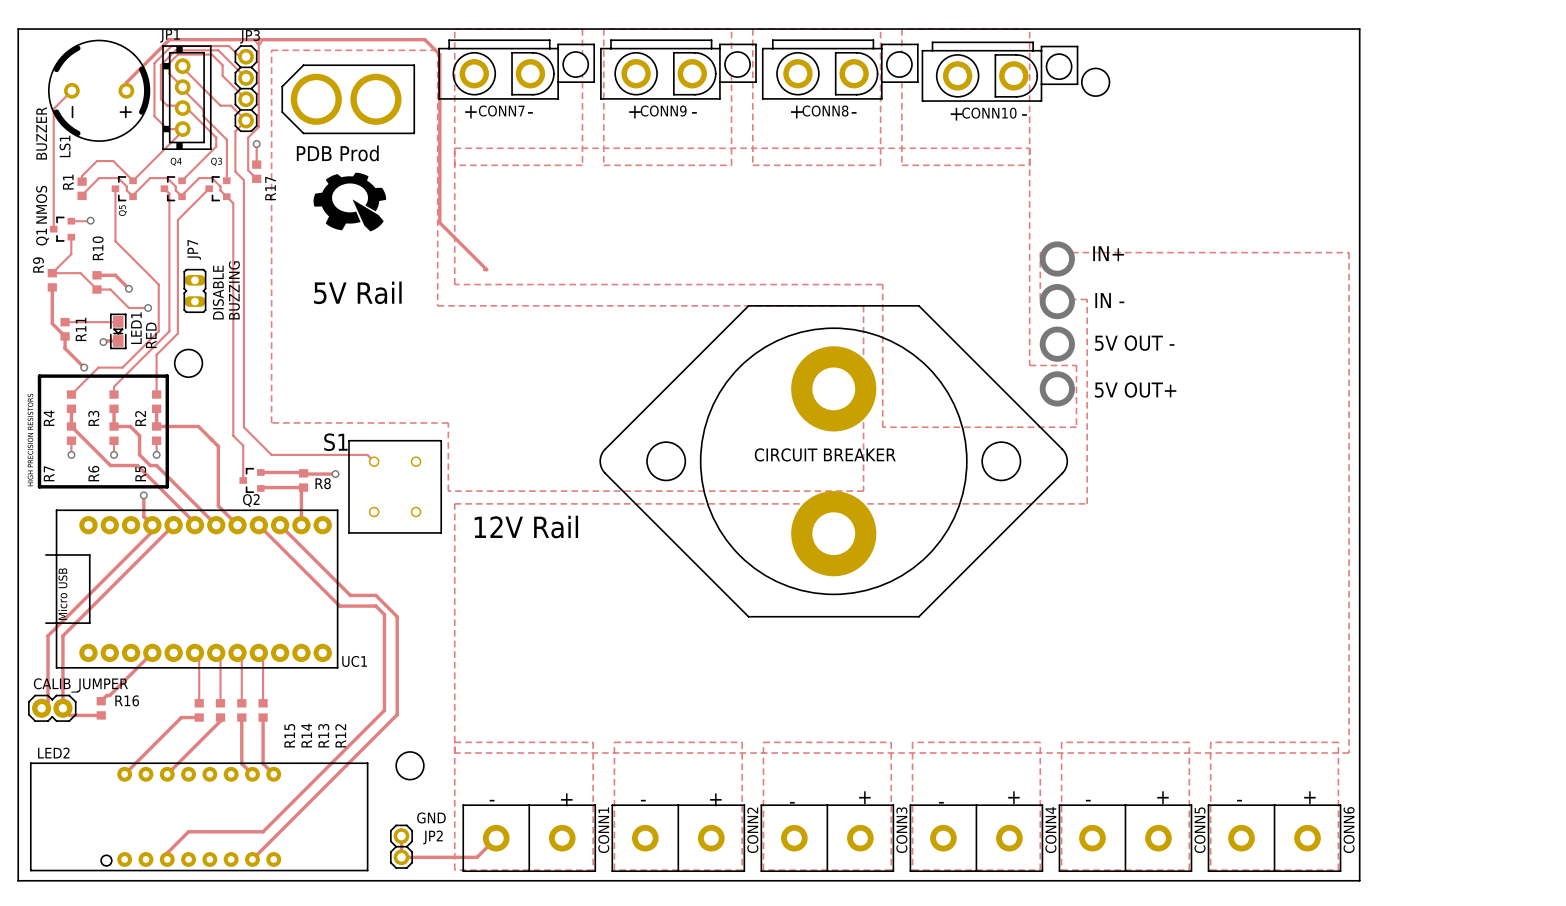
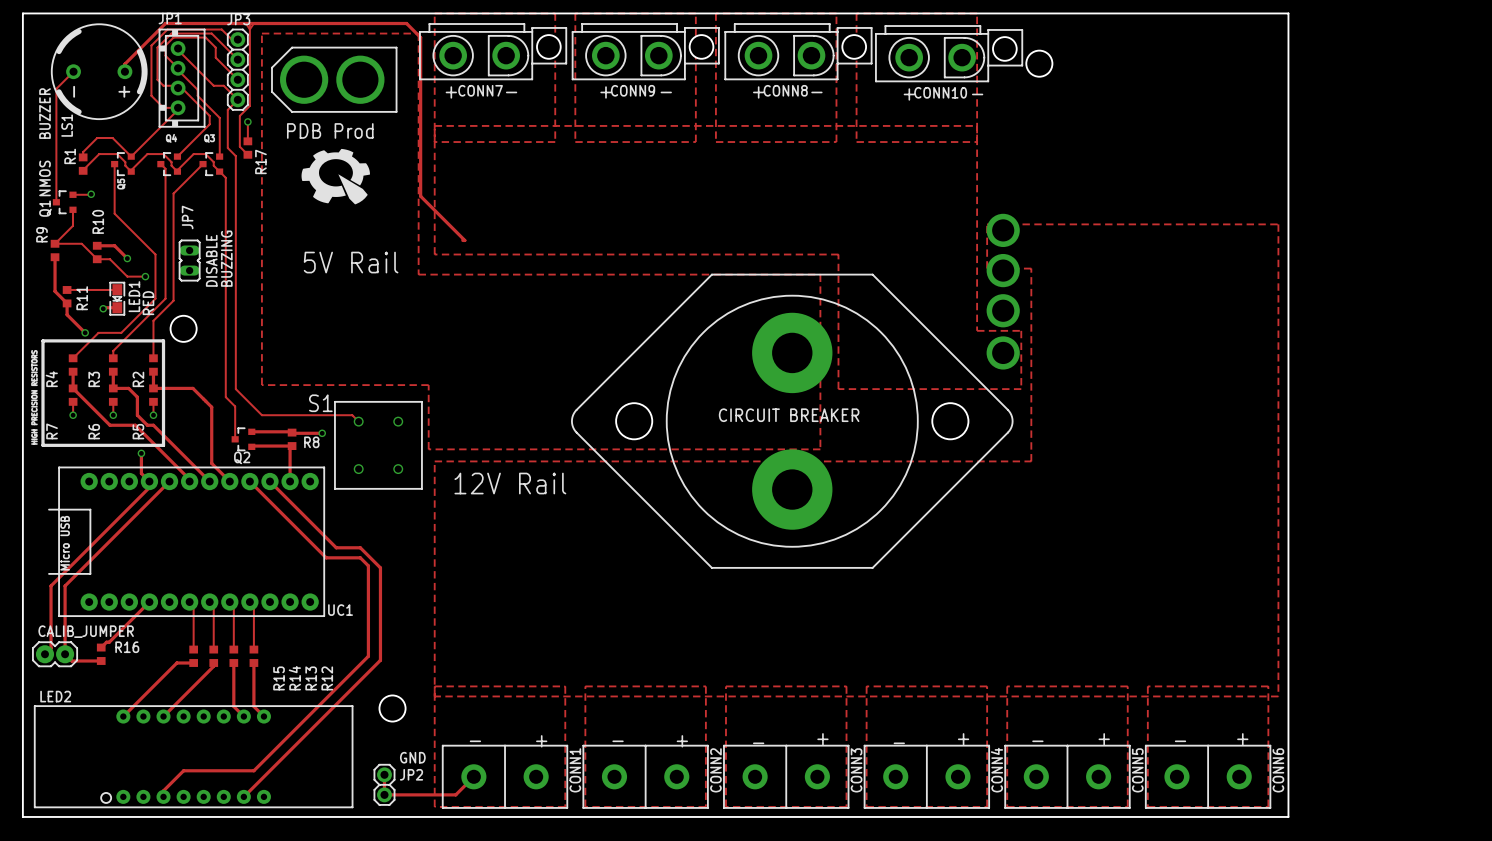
text: IN+ (1108, 253) -> none
text: IN - (1109, 300) -> none
text: 5V OUT - (1134, 343) -> none
text: 5V OUT+ (1135, 389) -> none

